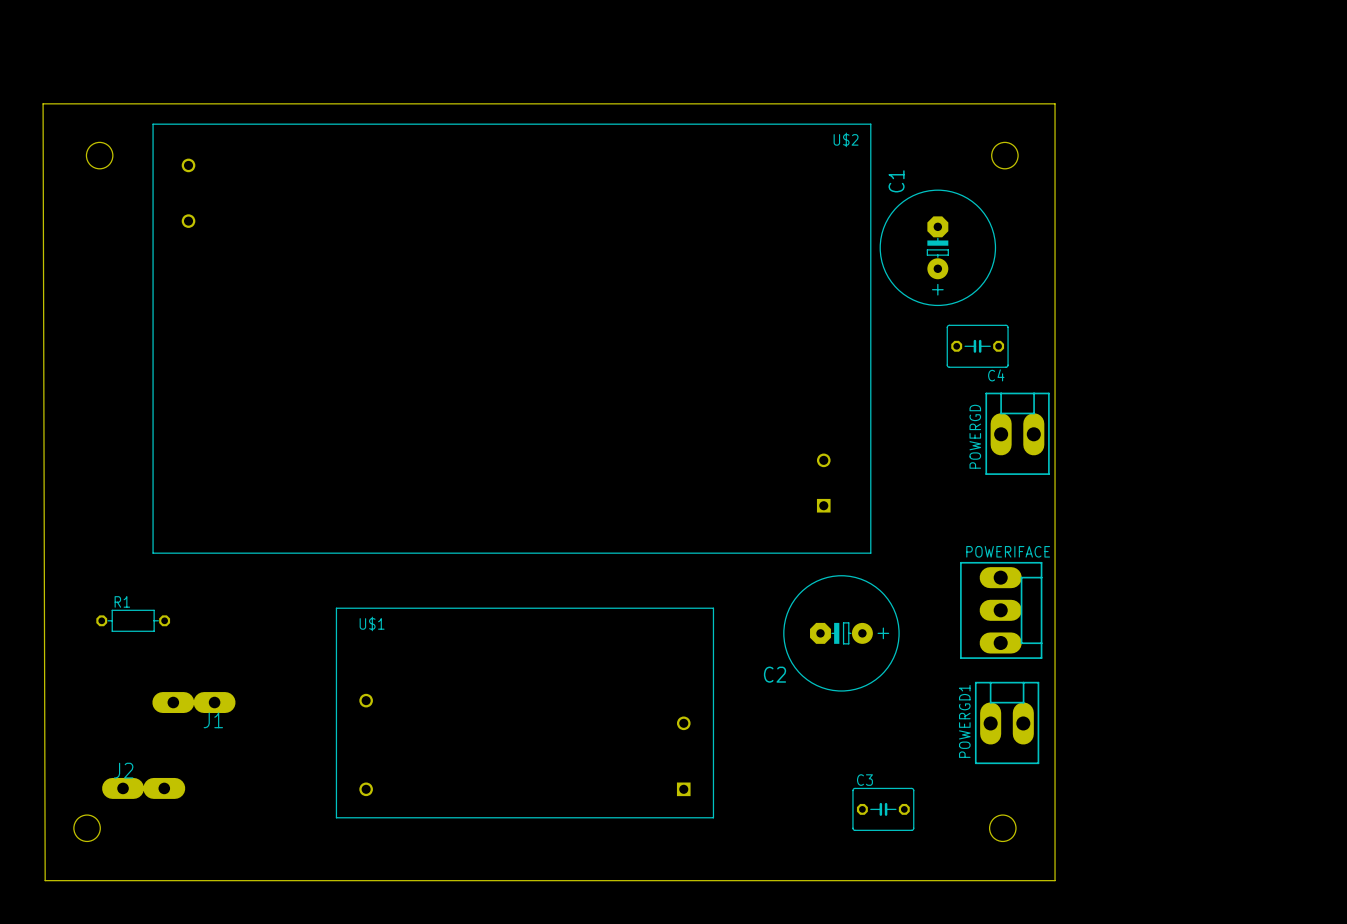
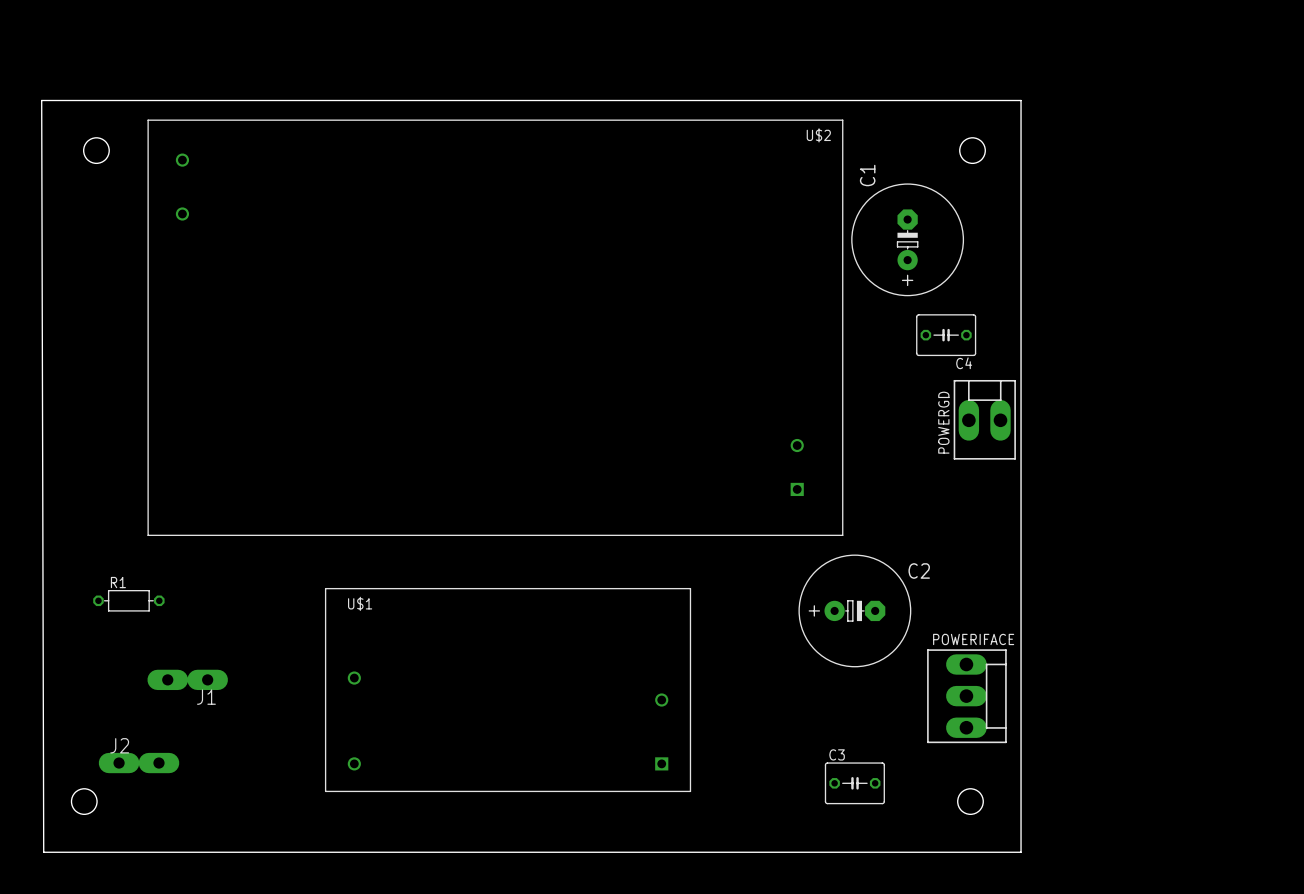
POWERIFACE position: (1001, 610) -> (966, 696)
C2 rotation: 0° (841, 633) -> 180° (854, 610)
POWERGD1: (1007, 722) -> none

